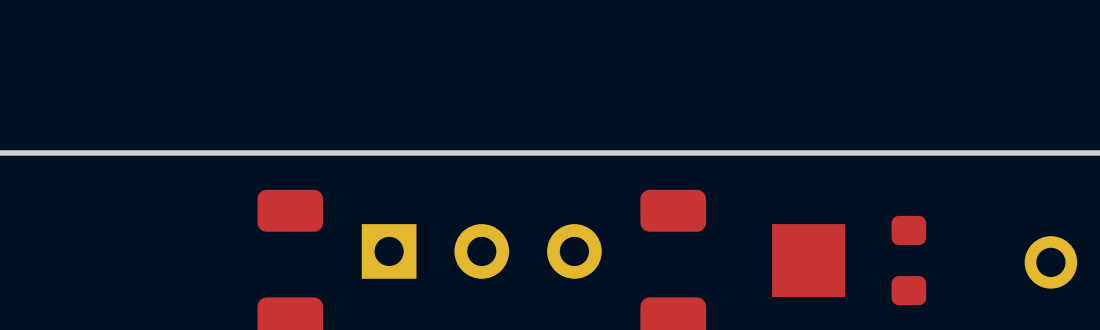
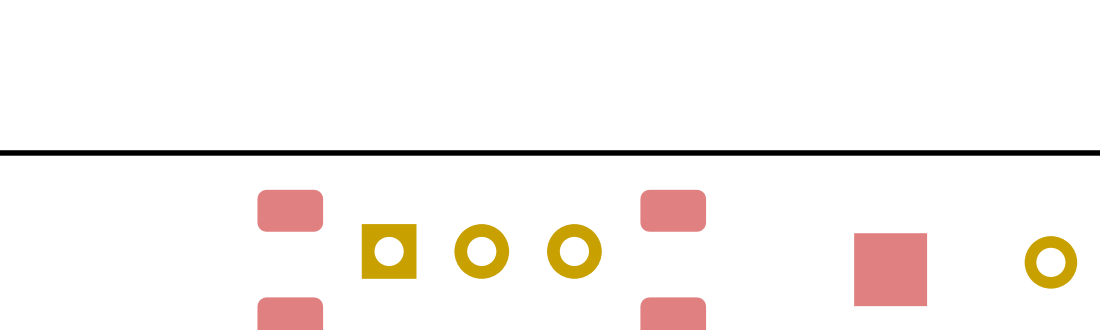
part footprint: [891, 215, 927, 306] -> [854, 233, 928, 307]
part: (808, 260) -> none

